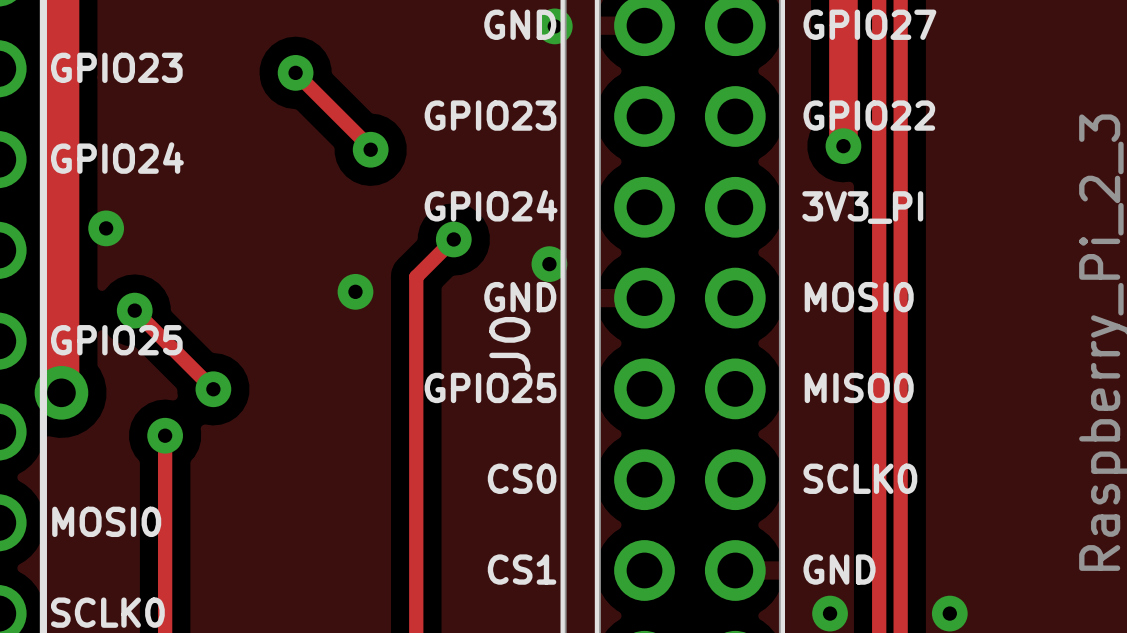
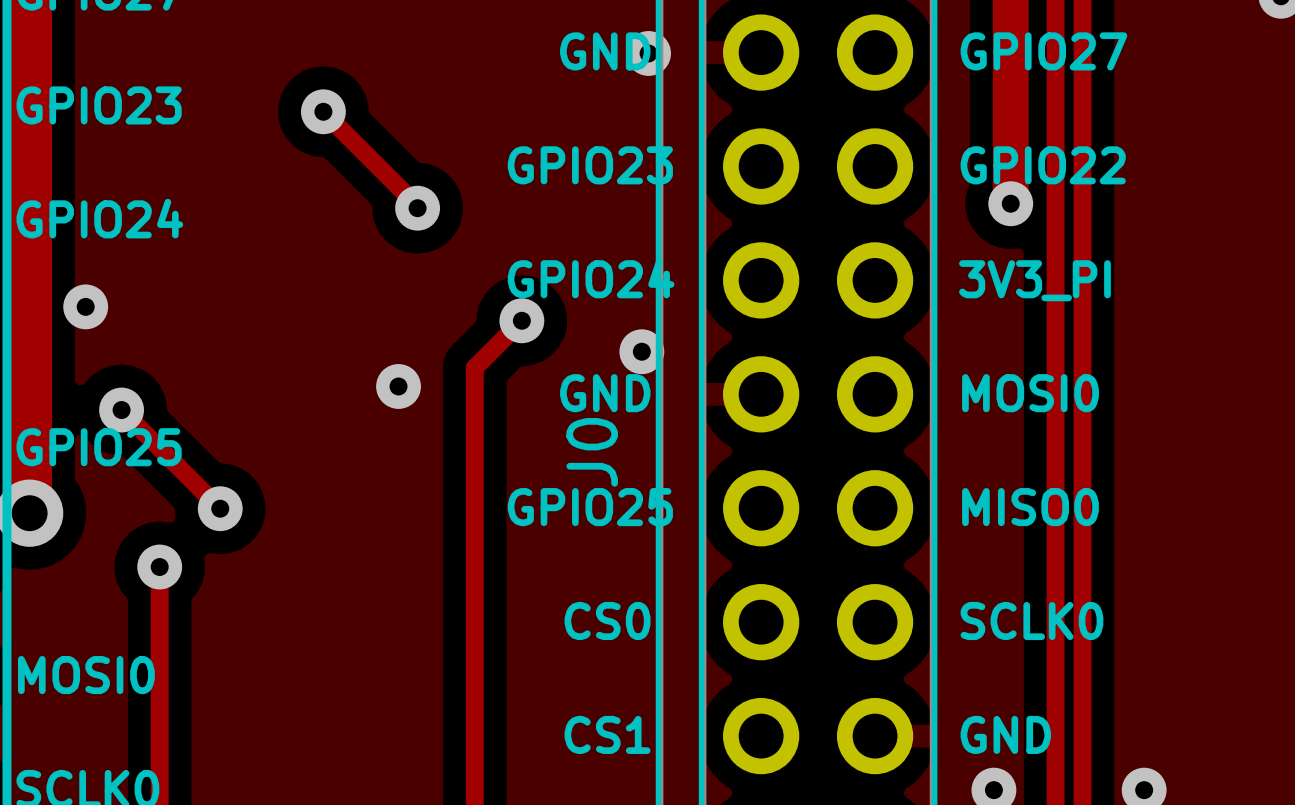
text position: GPIO23 (490, 115) -> GPIO23 (590, 165)
text position: GPIO24 (491, 205) -> GPIO24 (591, 278)
text position: GPIO25 (490, 387) -> GPIO25 (590, 507)

